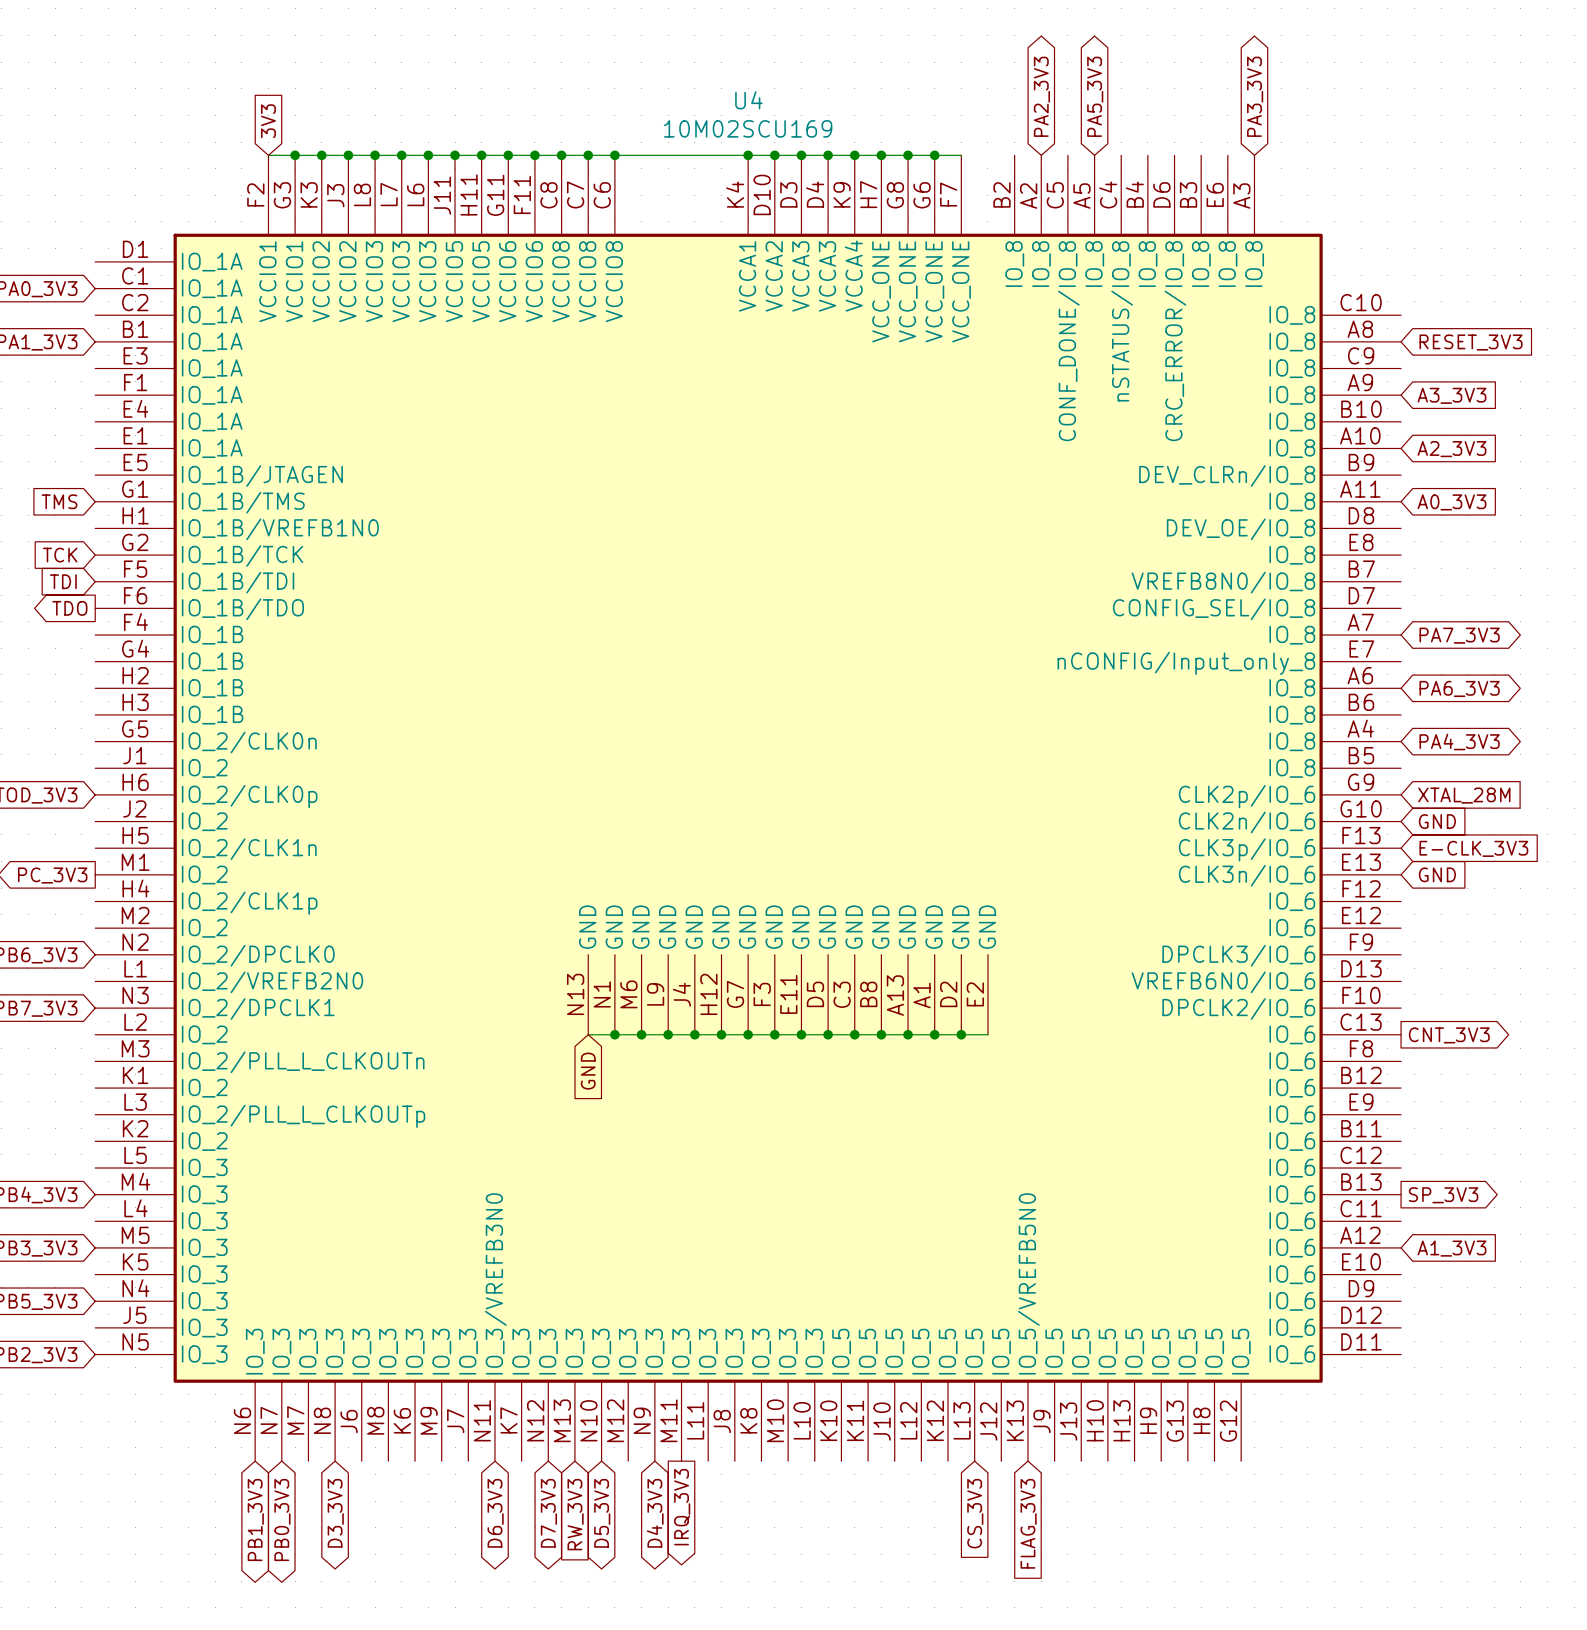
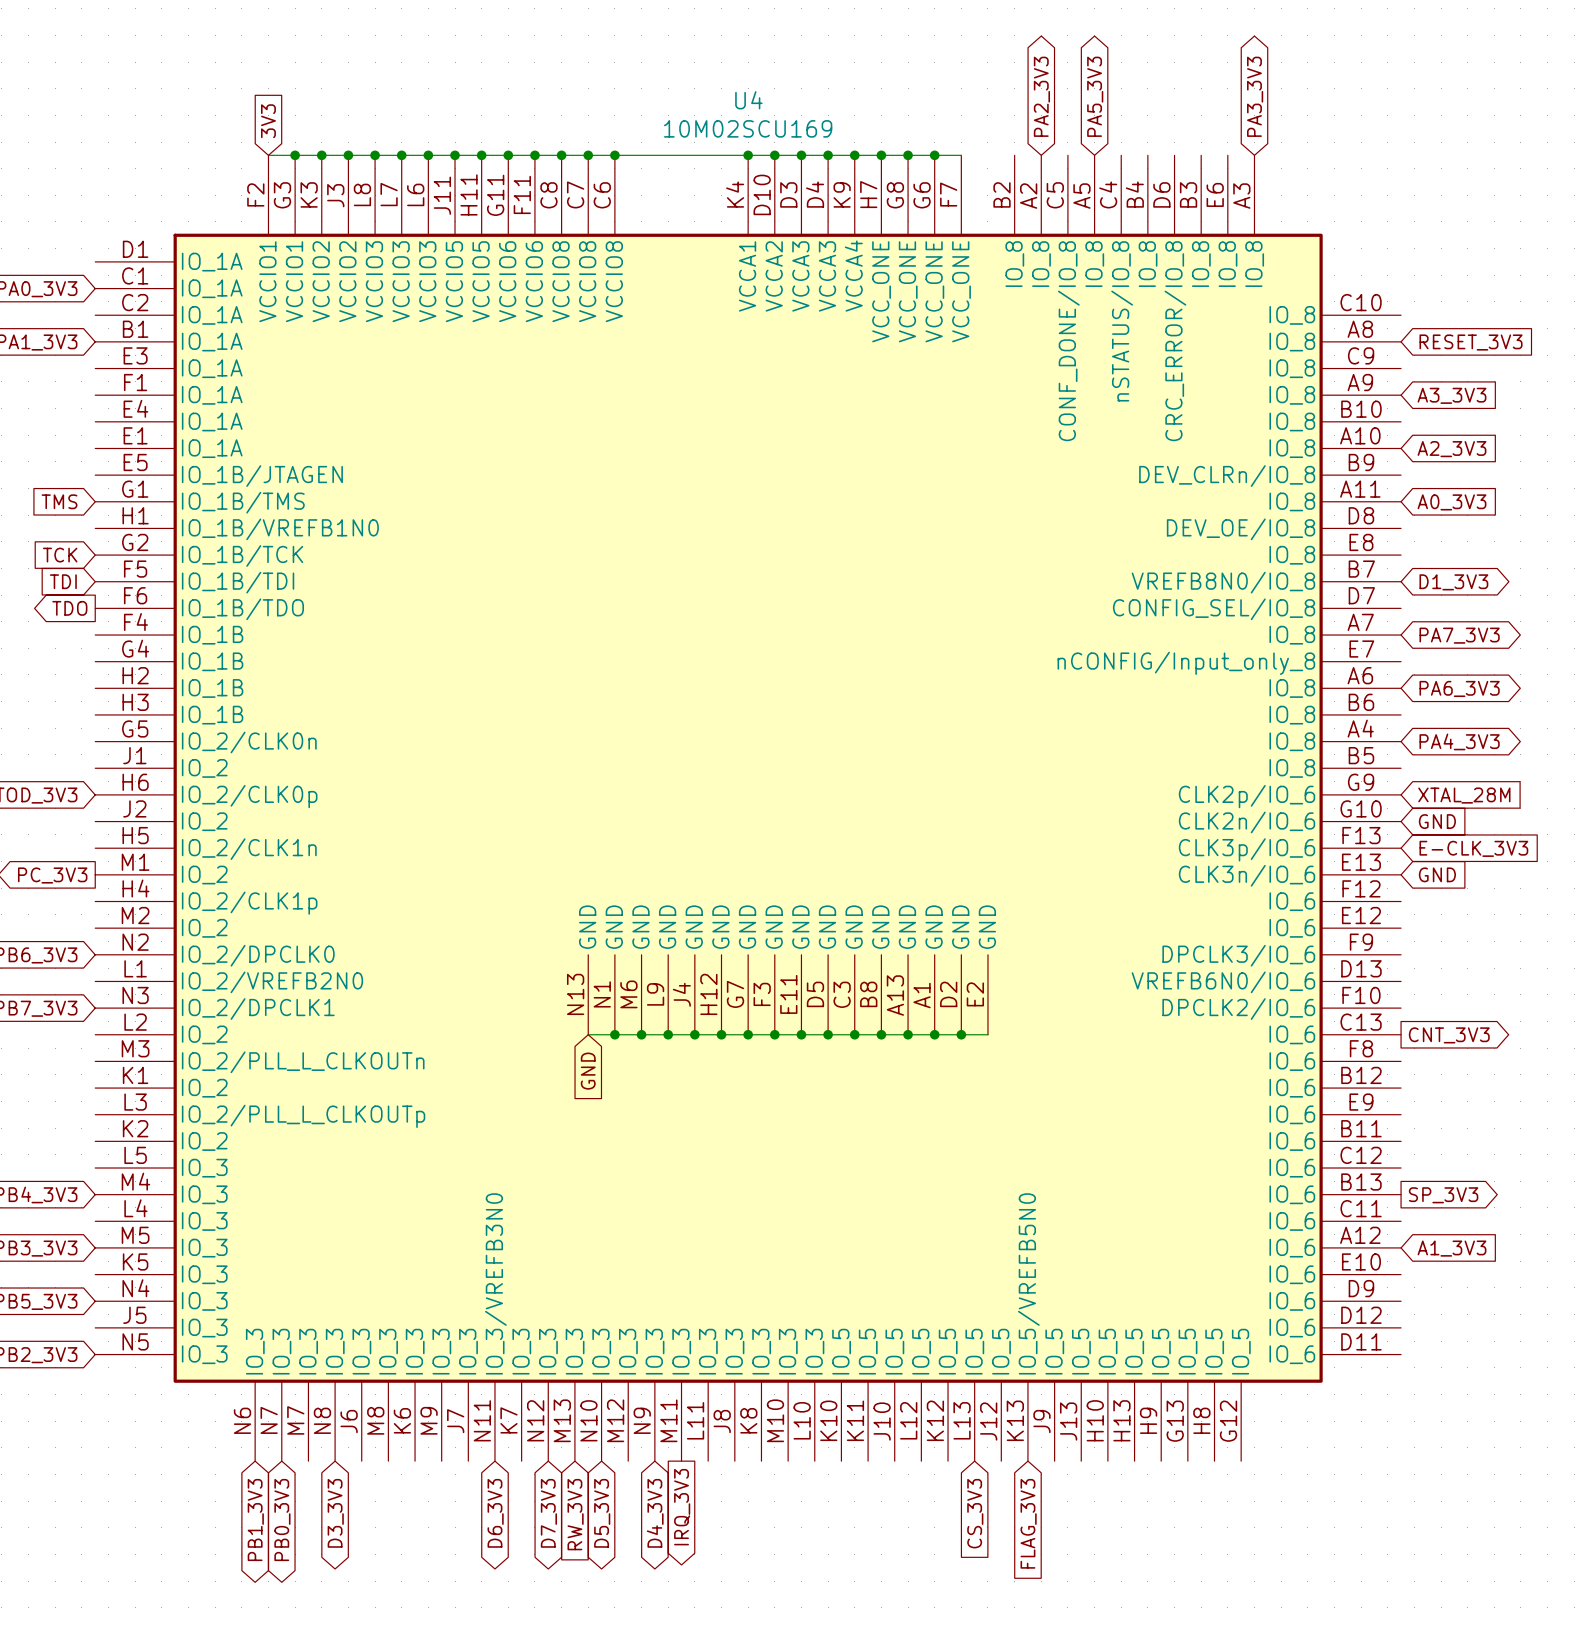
global label: none -> D1_3V3 (1453, 582)

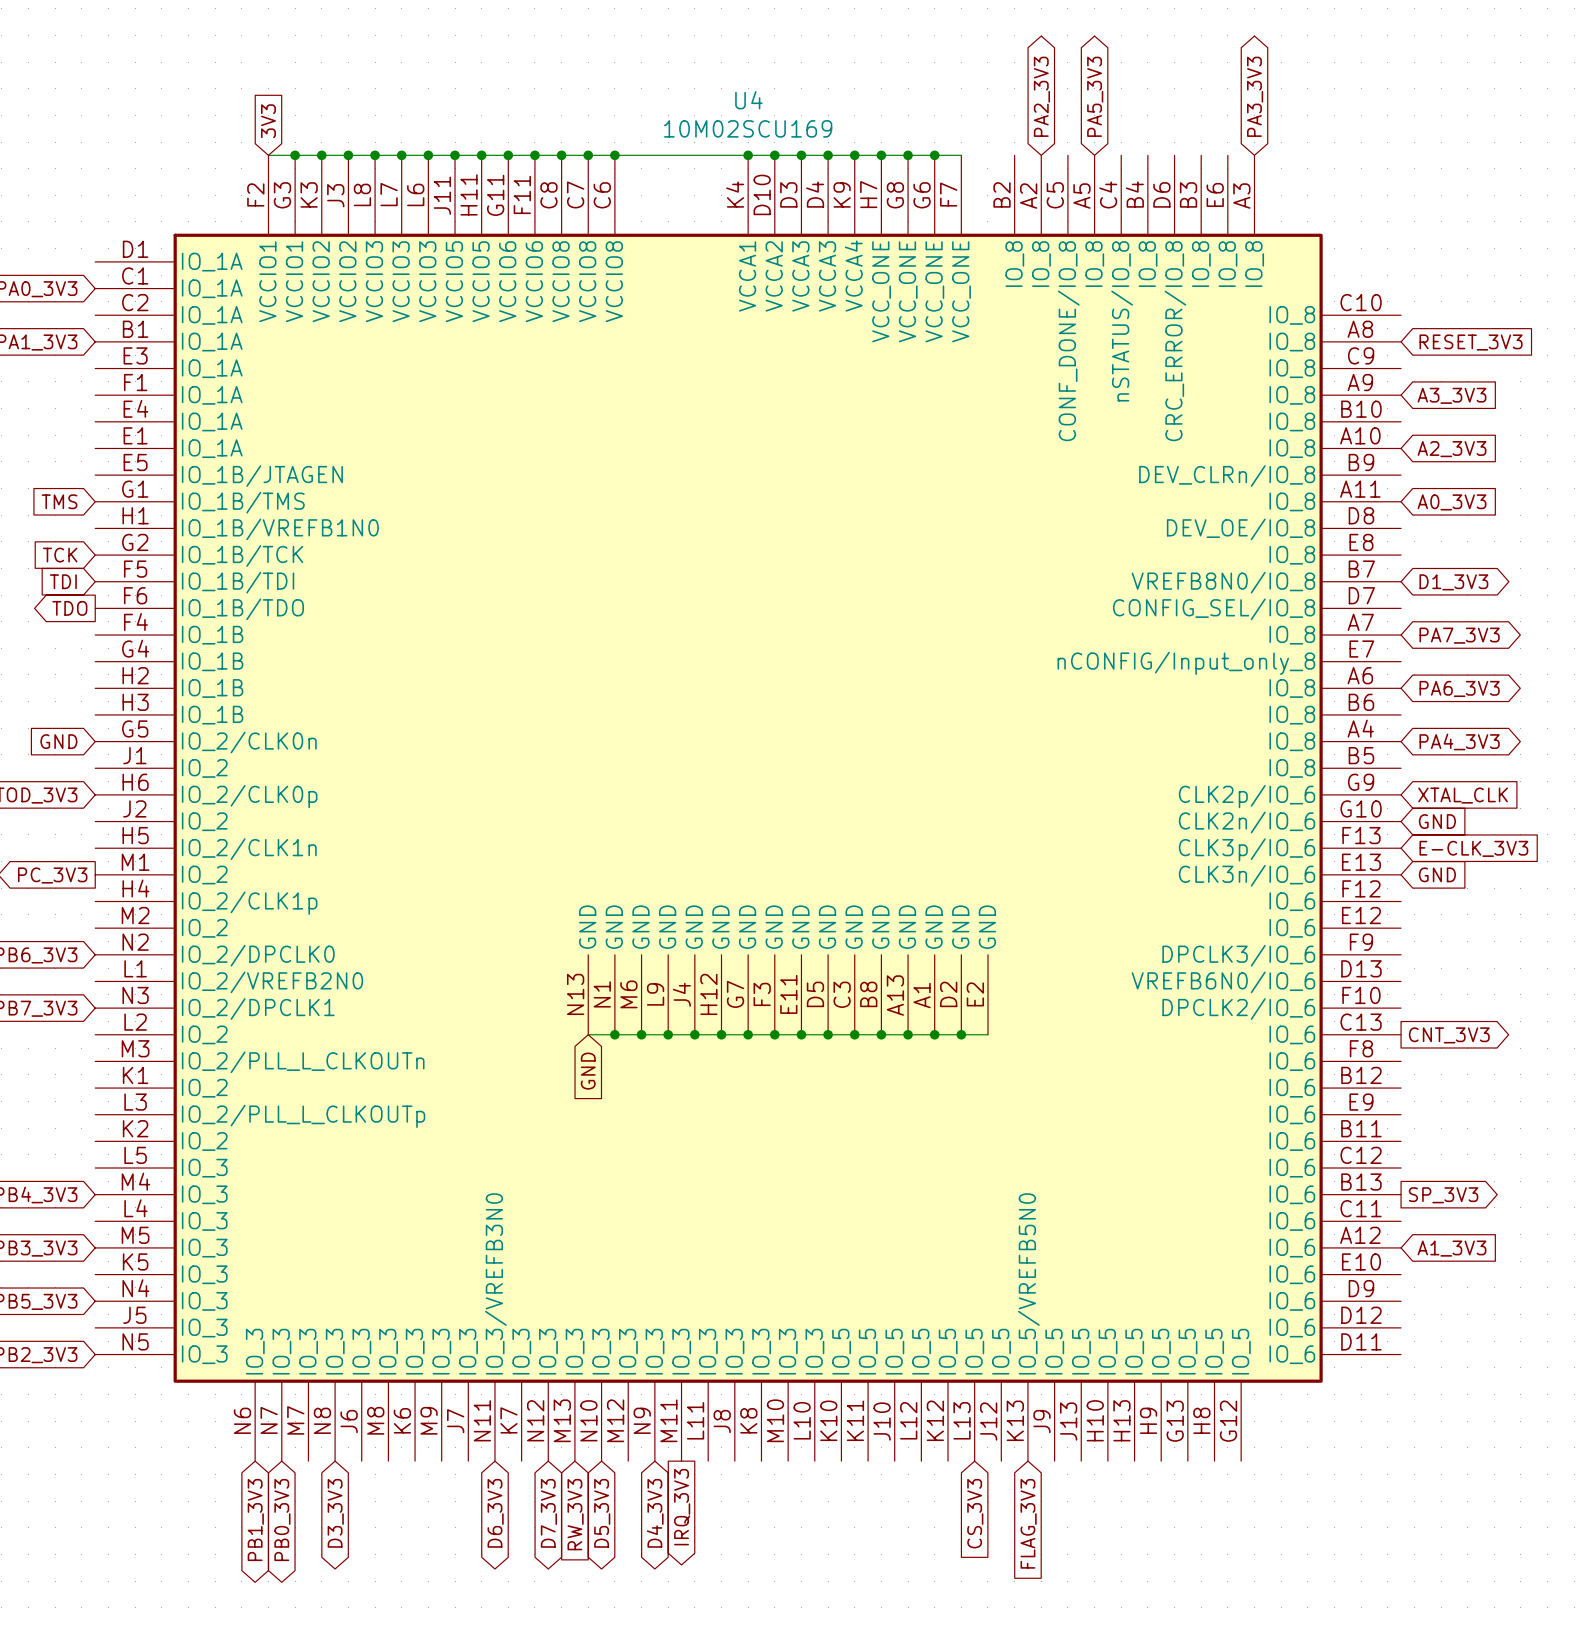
global label: none -> GND (58, 741)
global label: XTAL_28M (1464, 795) -> XTAL_CLK (1463, 795)

